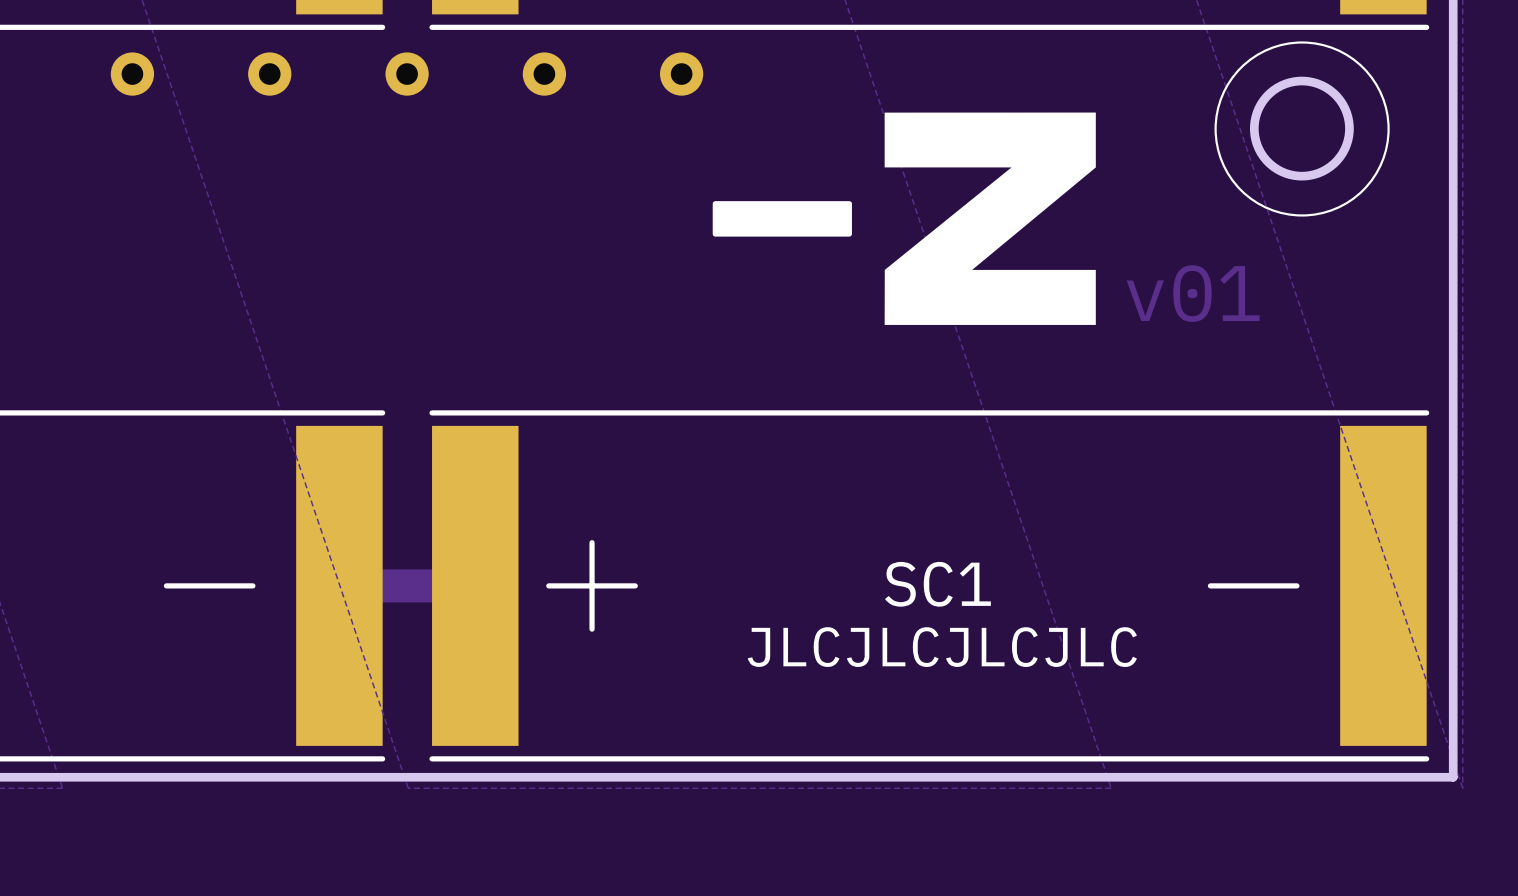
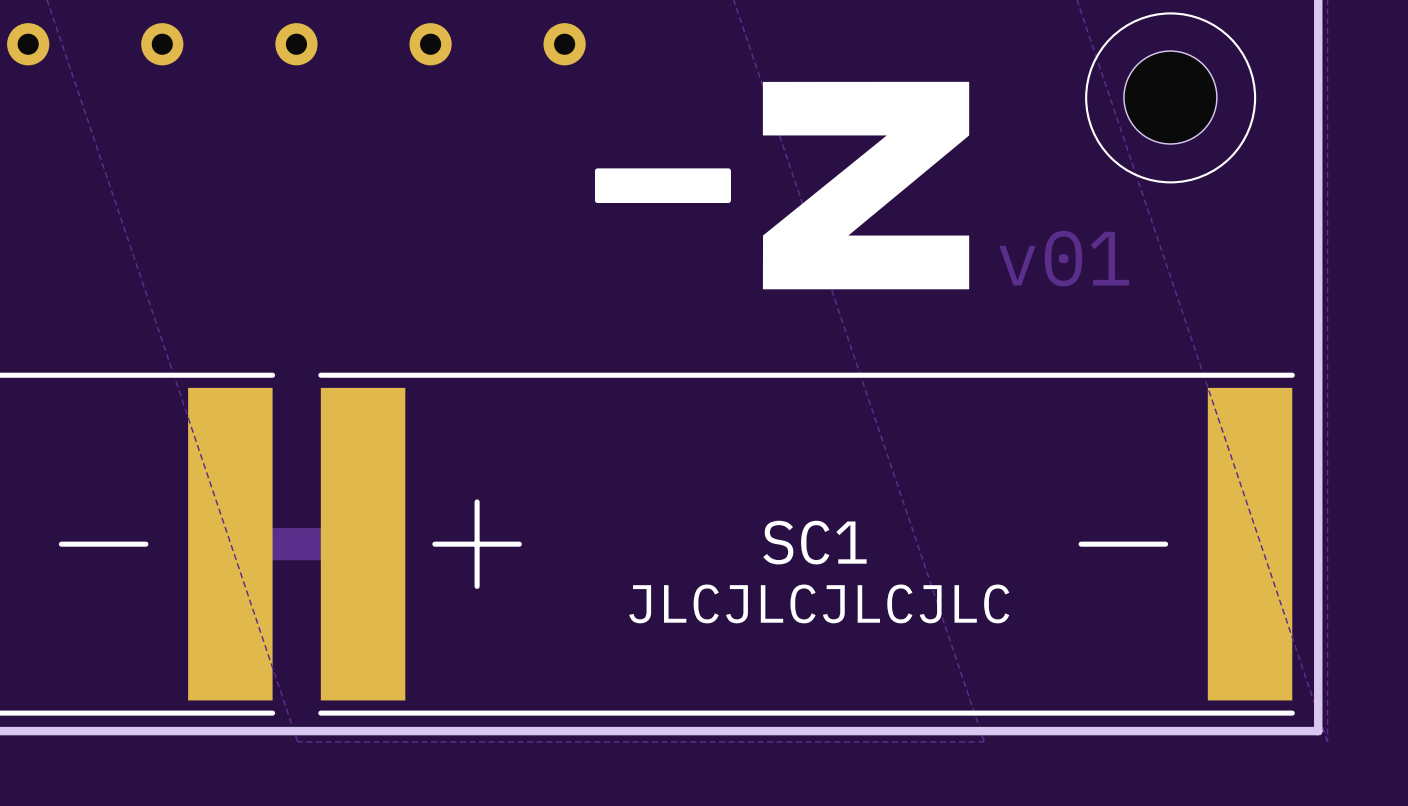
round board edge: [1249, 76, 1354, 181] -> none
part: none -> (1170, 97)

